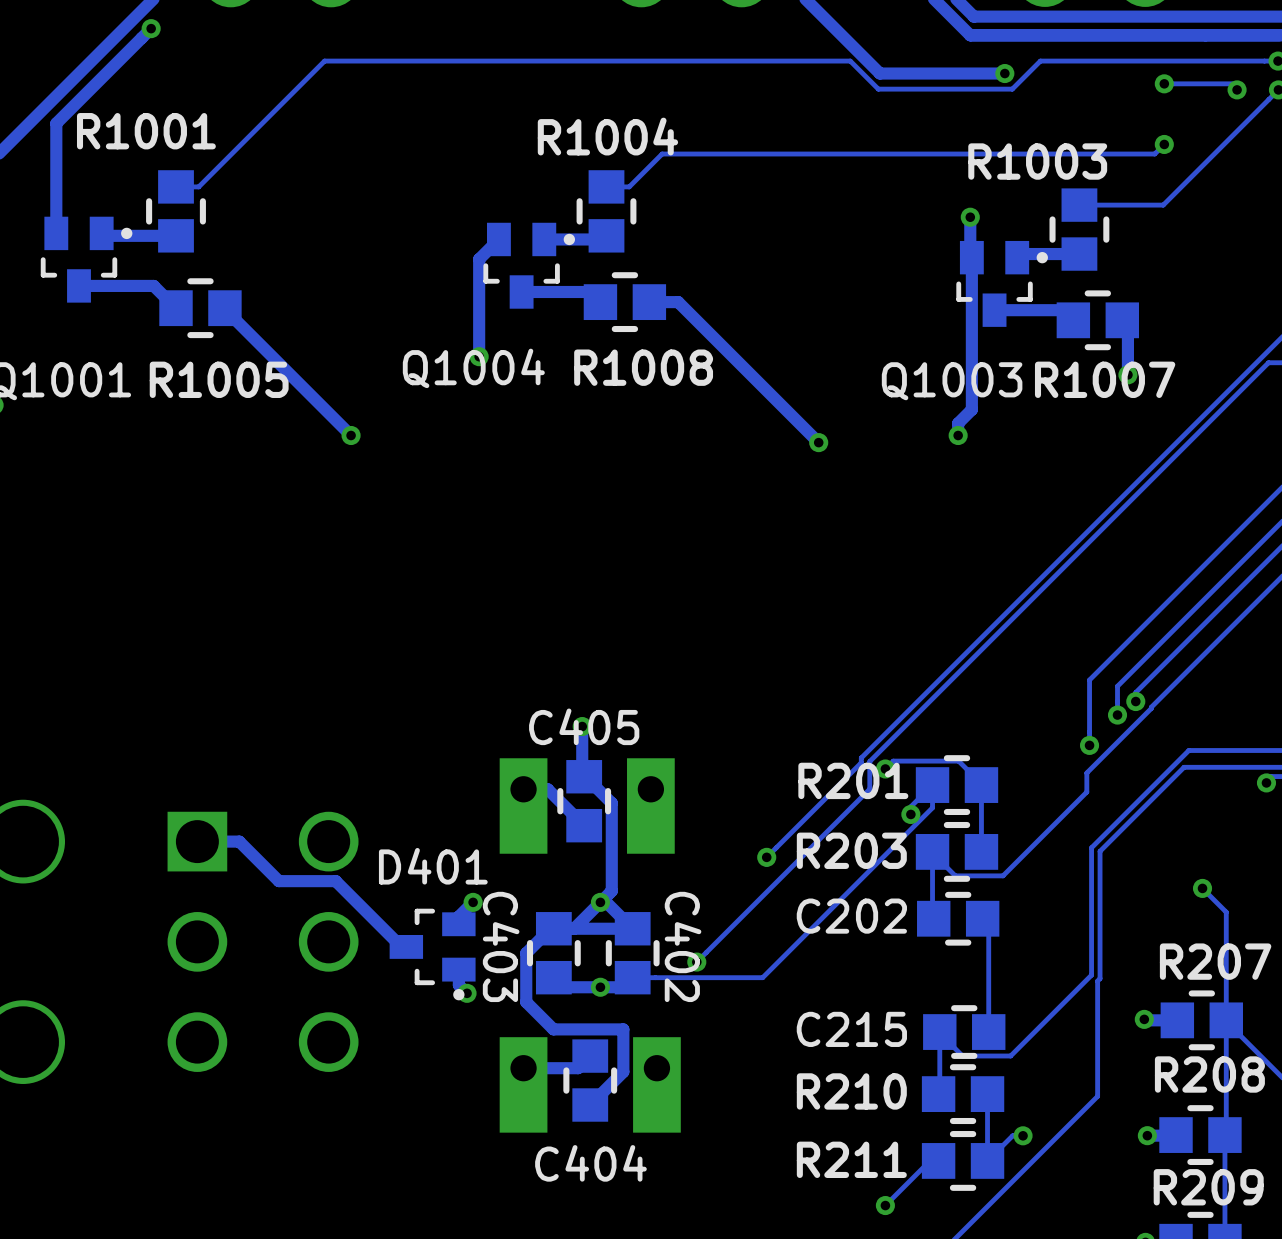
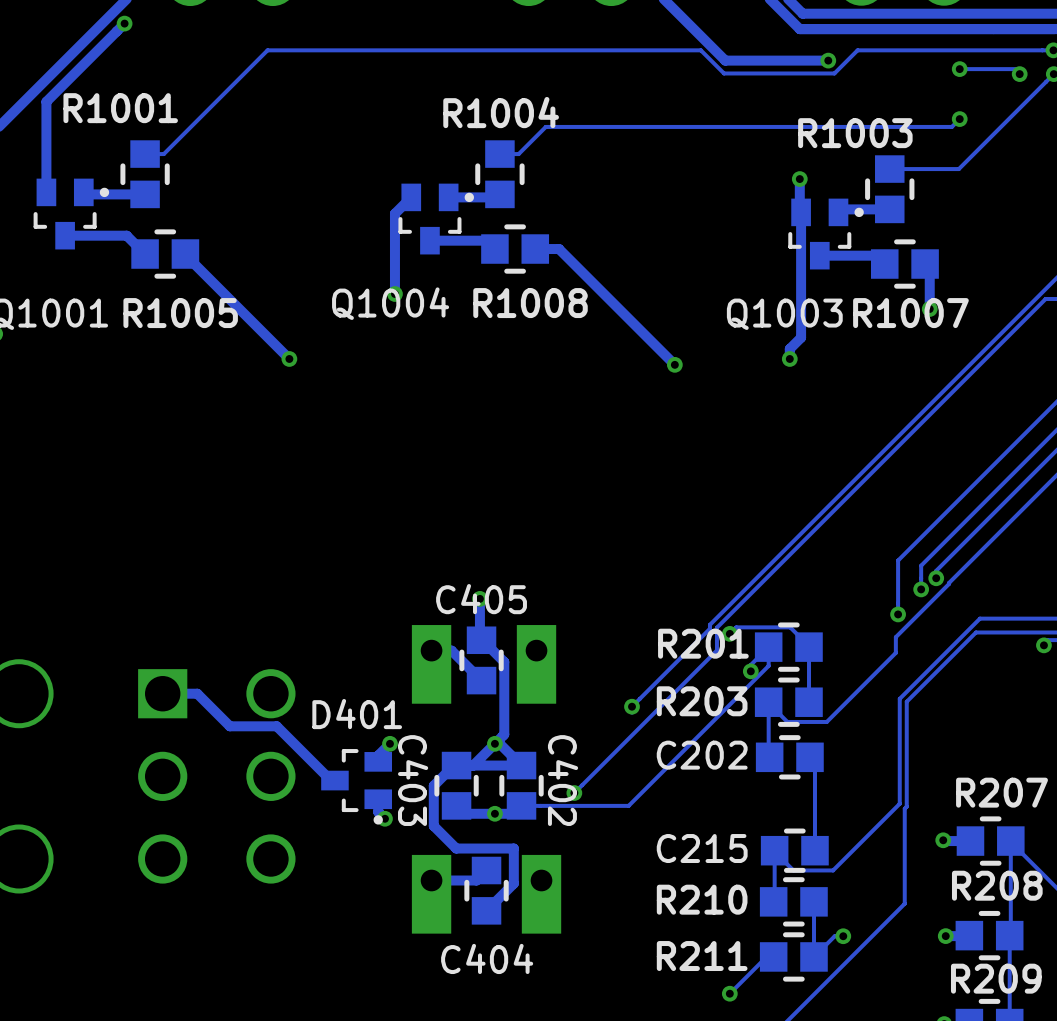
track: (1202, 888) (1226, 912) (1226, 1020) -> none
via: (1202, 888) -> none

